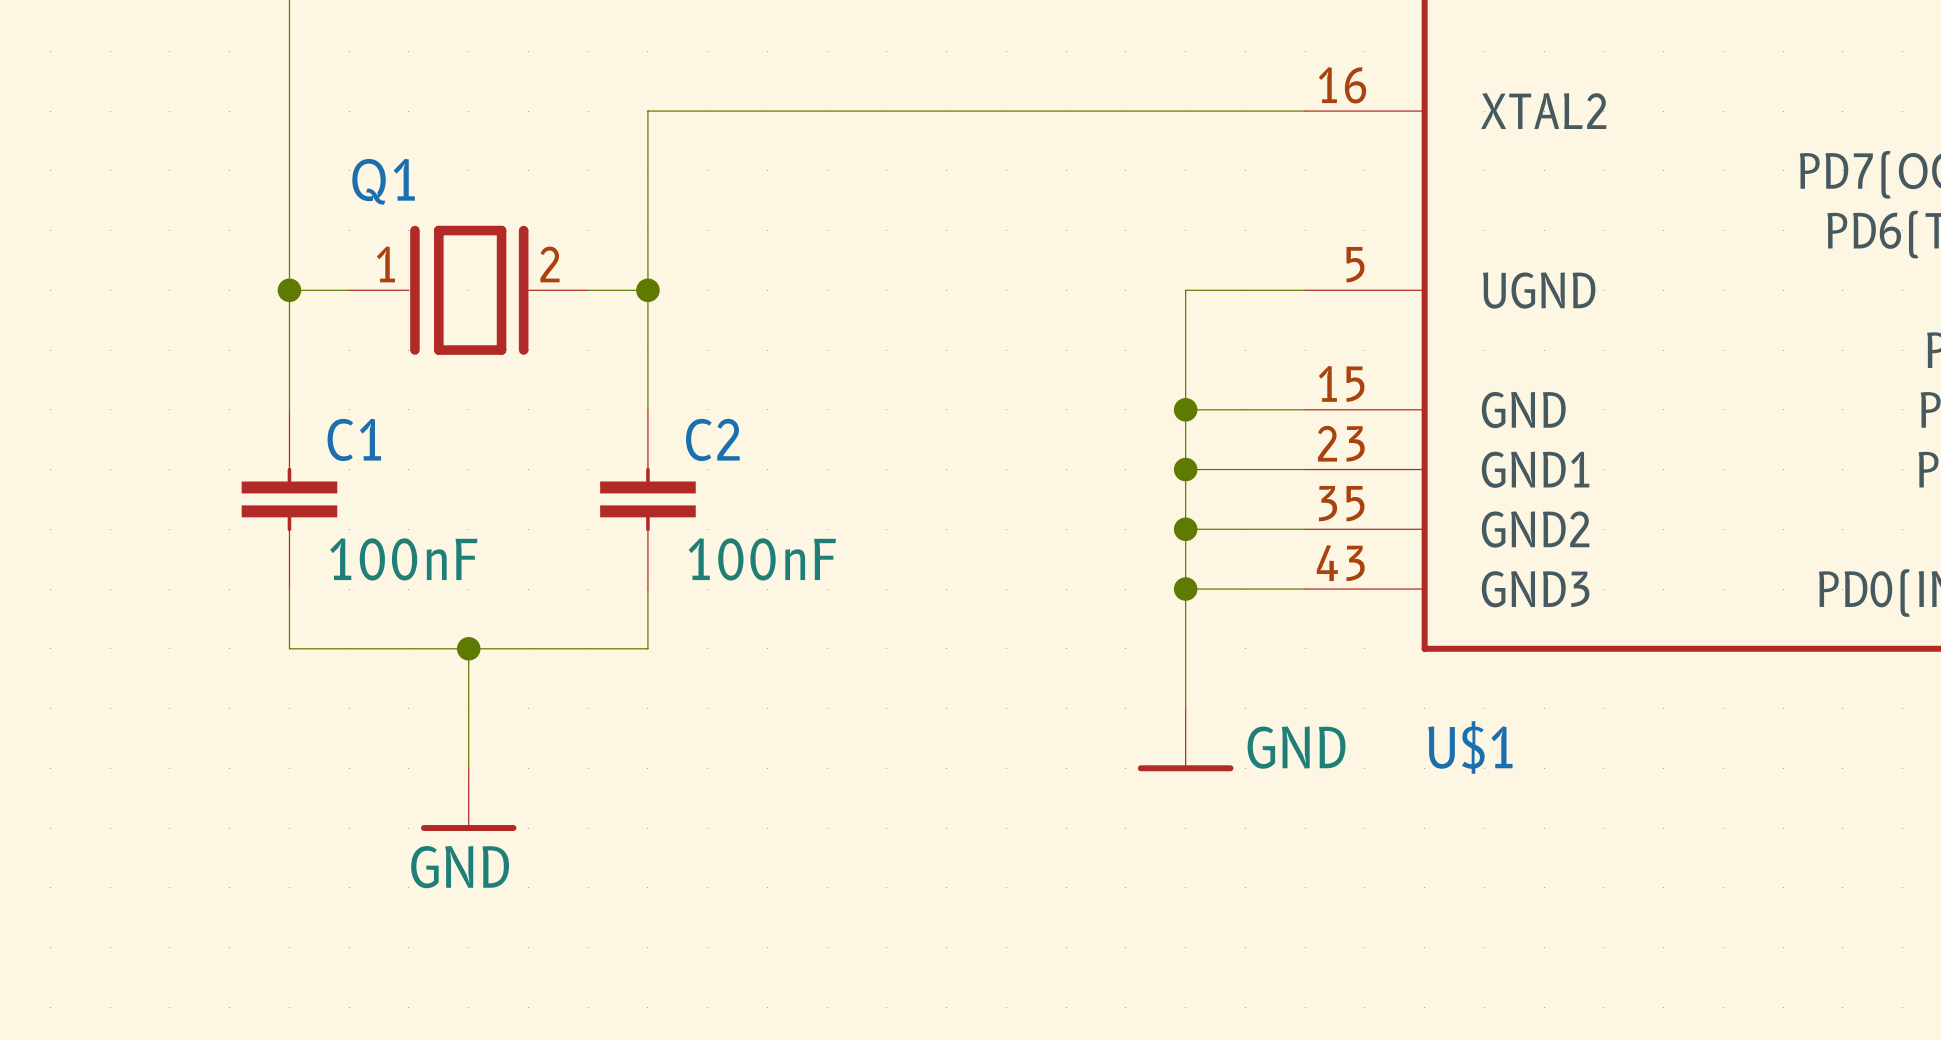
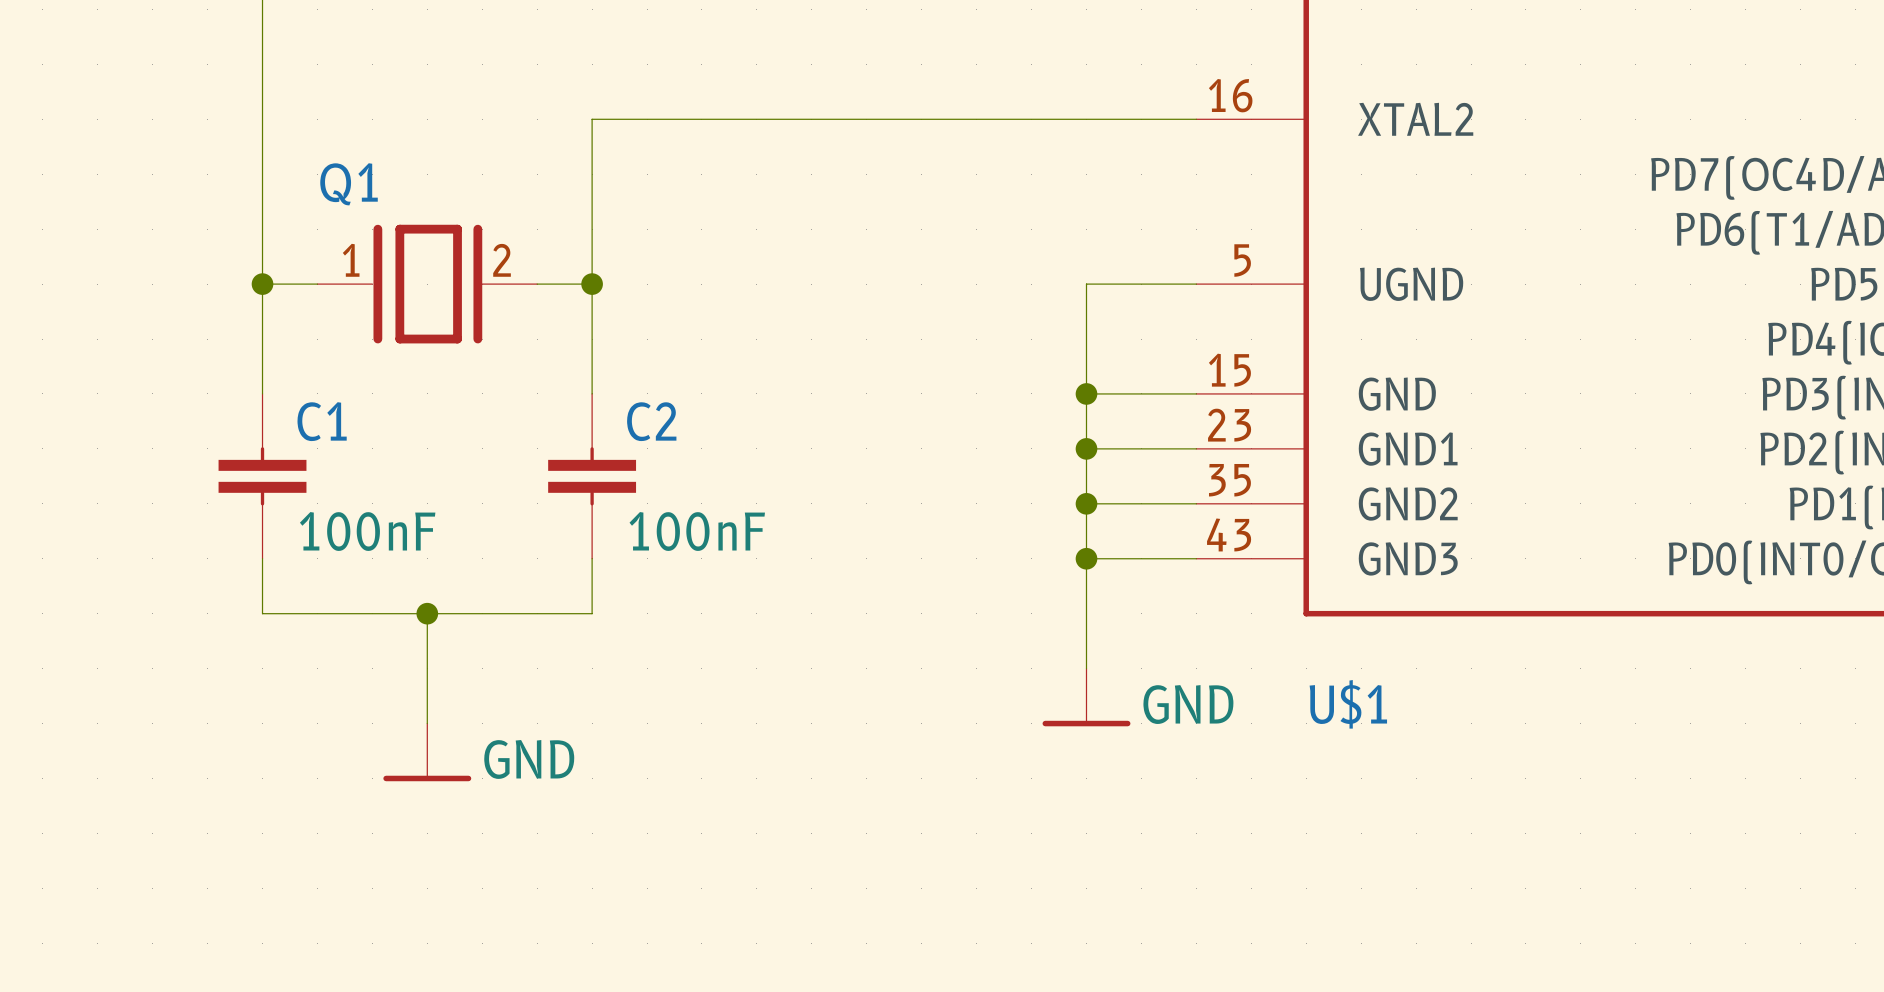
power symbol text position: GND (460, 867) -> GND (529, 759)

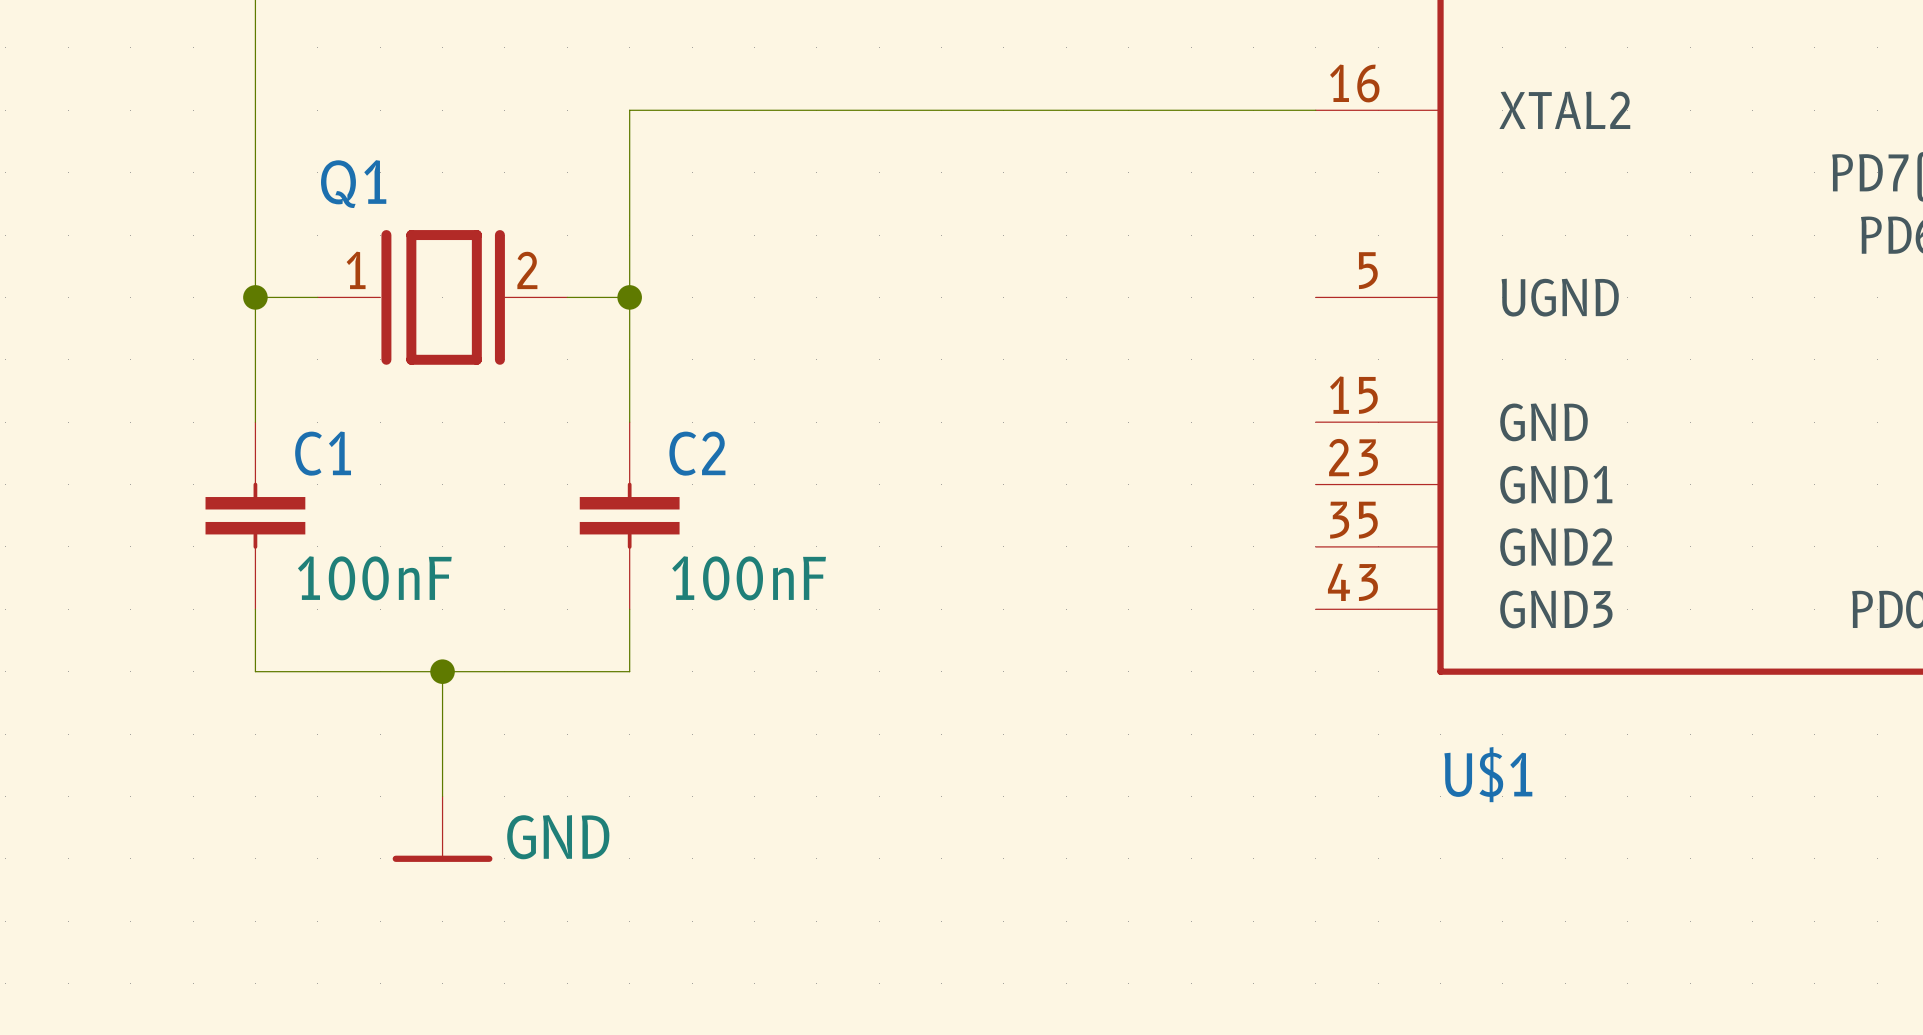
wire: (1196, 284) (1086, 284) (1086, 668) -> none
wire: (1086, 393) (1196, 393) -> none
junction: (1086, 393) -> none
wire: (1086, 448) (1196, 448) -> none
junction: (1086, 448) -> none
wire: (1086, 503) (1196, 503) -> none
junction: (1086, 503) -> none
wire: (1086, 558) (1196, 558) -> none
junction: (1086, 558) -> none
power symbol: GND (1086, 697) -> none

